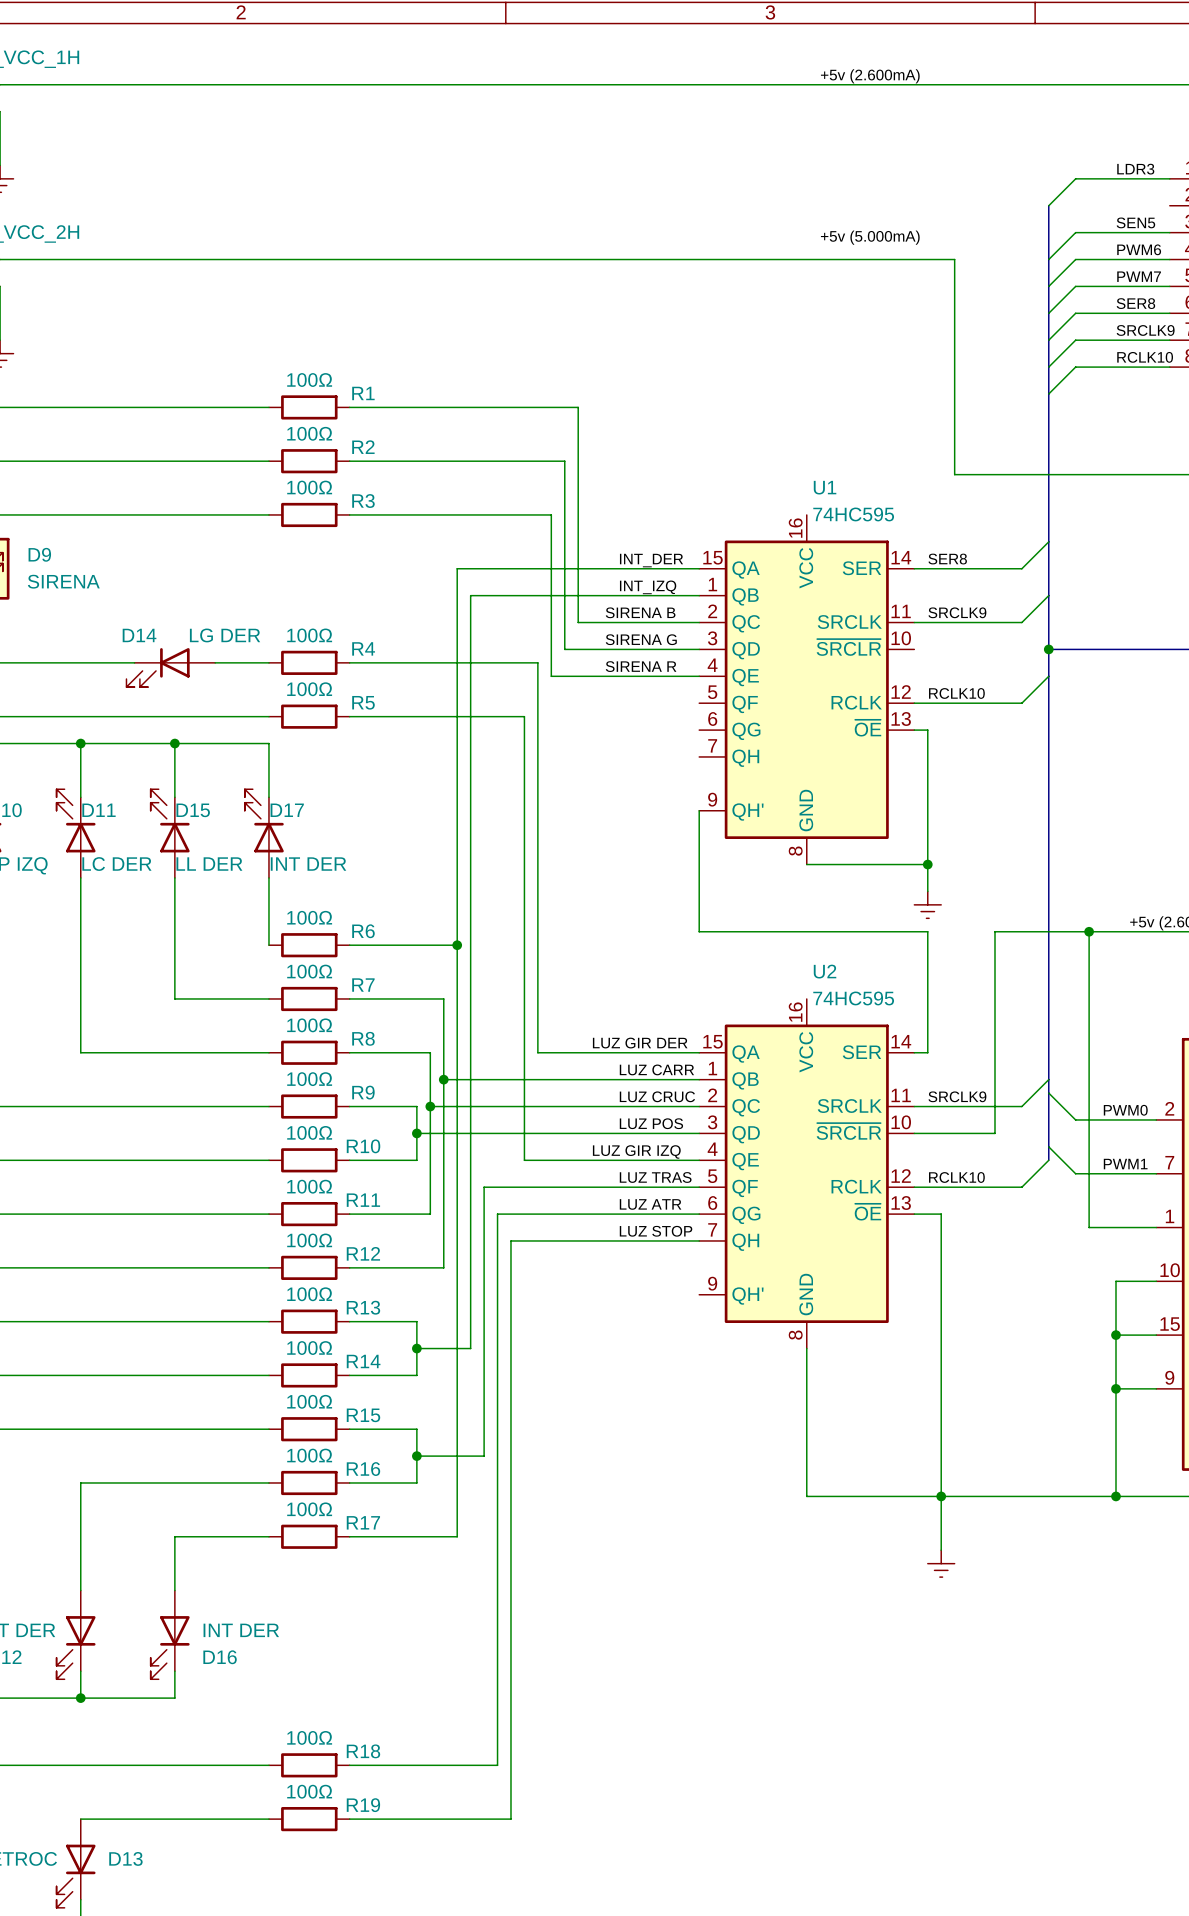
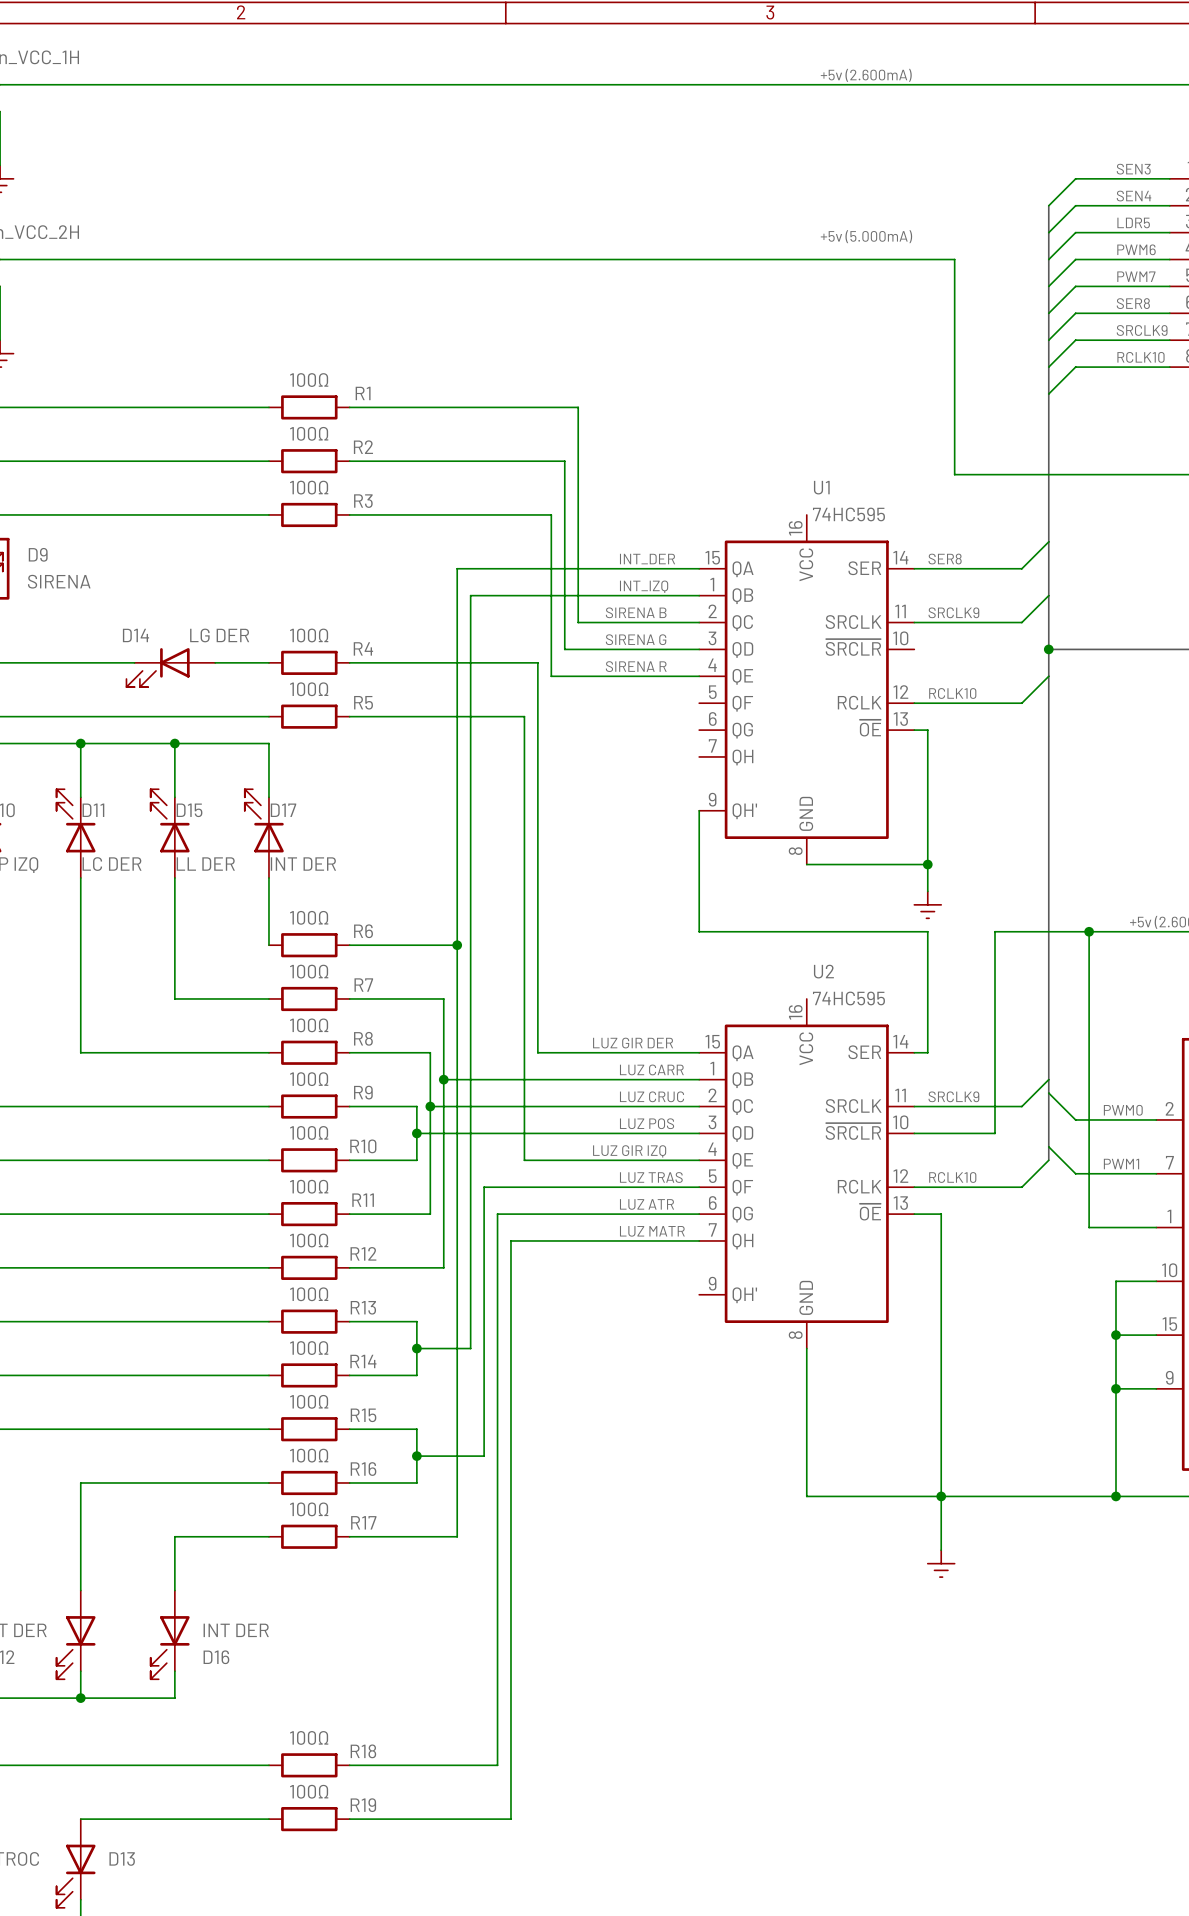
label: LDR3 (1135, 169) -> SEN3 (1133, 169)
label: none -> SEN4 (1134, 196)
wire: none -> (1169, 205) (1075, 205) (1048, 232)
label: SEN5 (1135, 222) -> LDR5 (1133, 222)
label: LUZ STOP (656, 1231) -> LUZ MATR (652, 1231)

